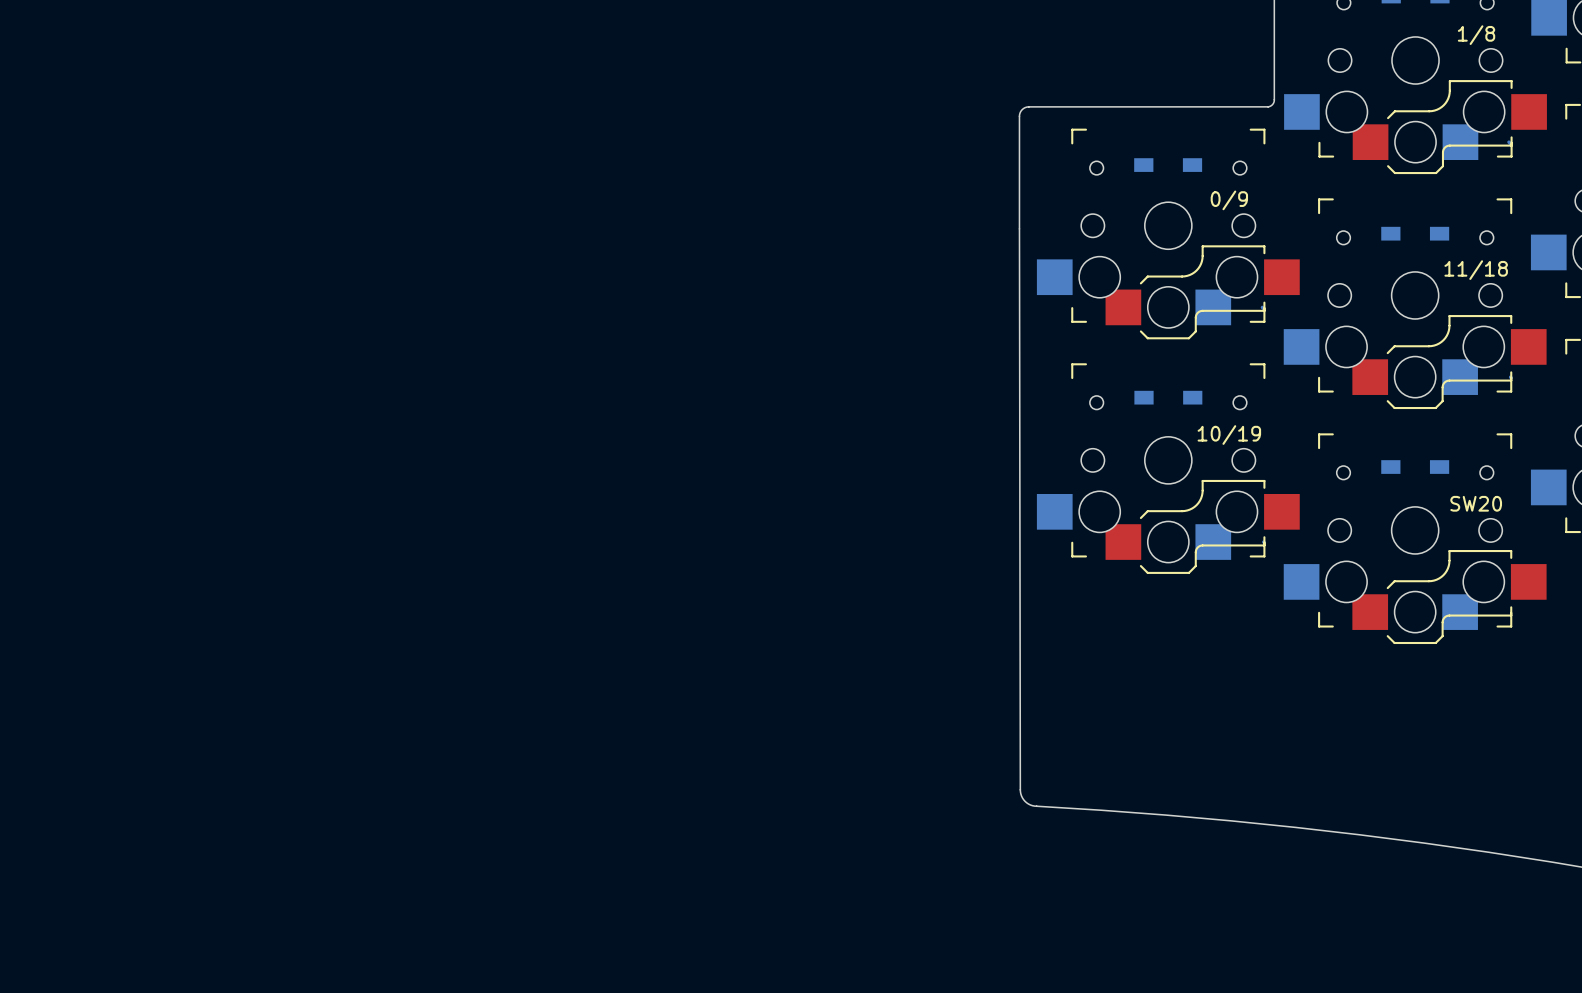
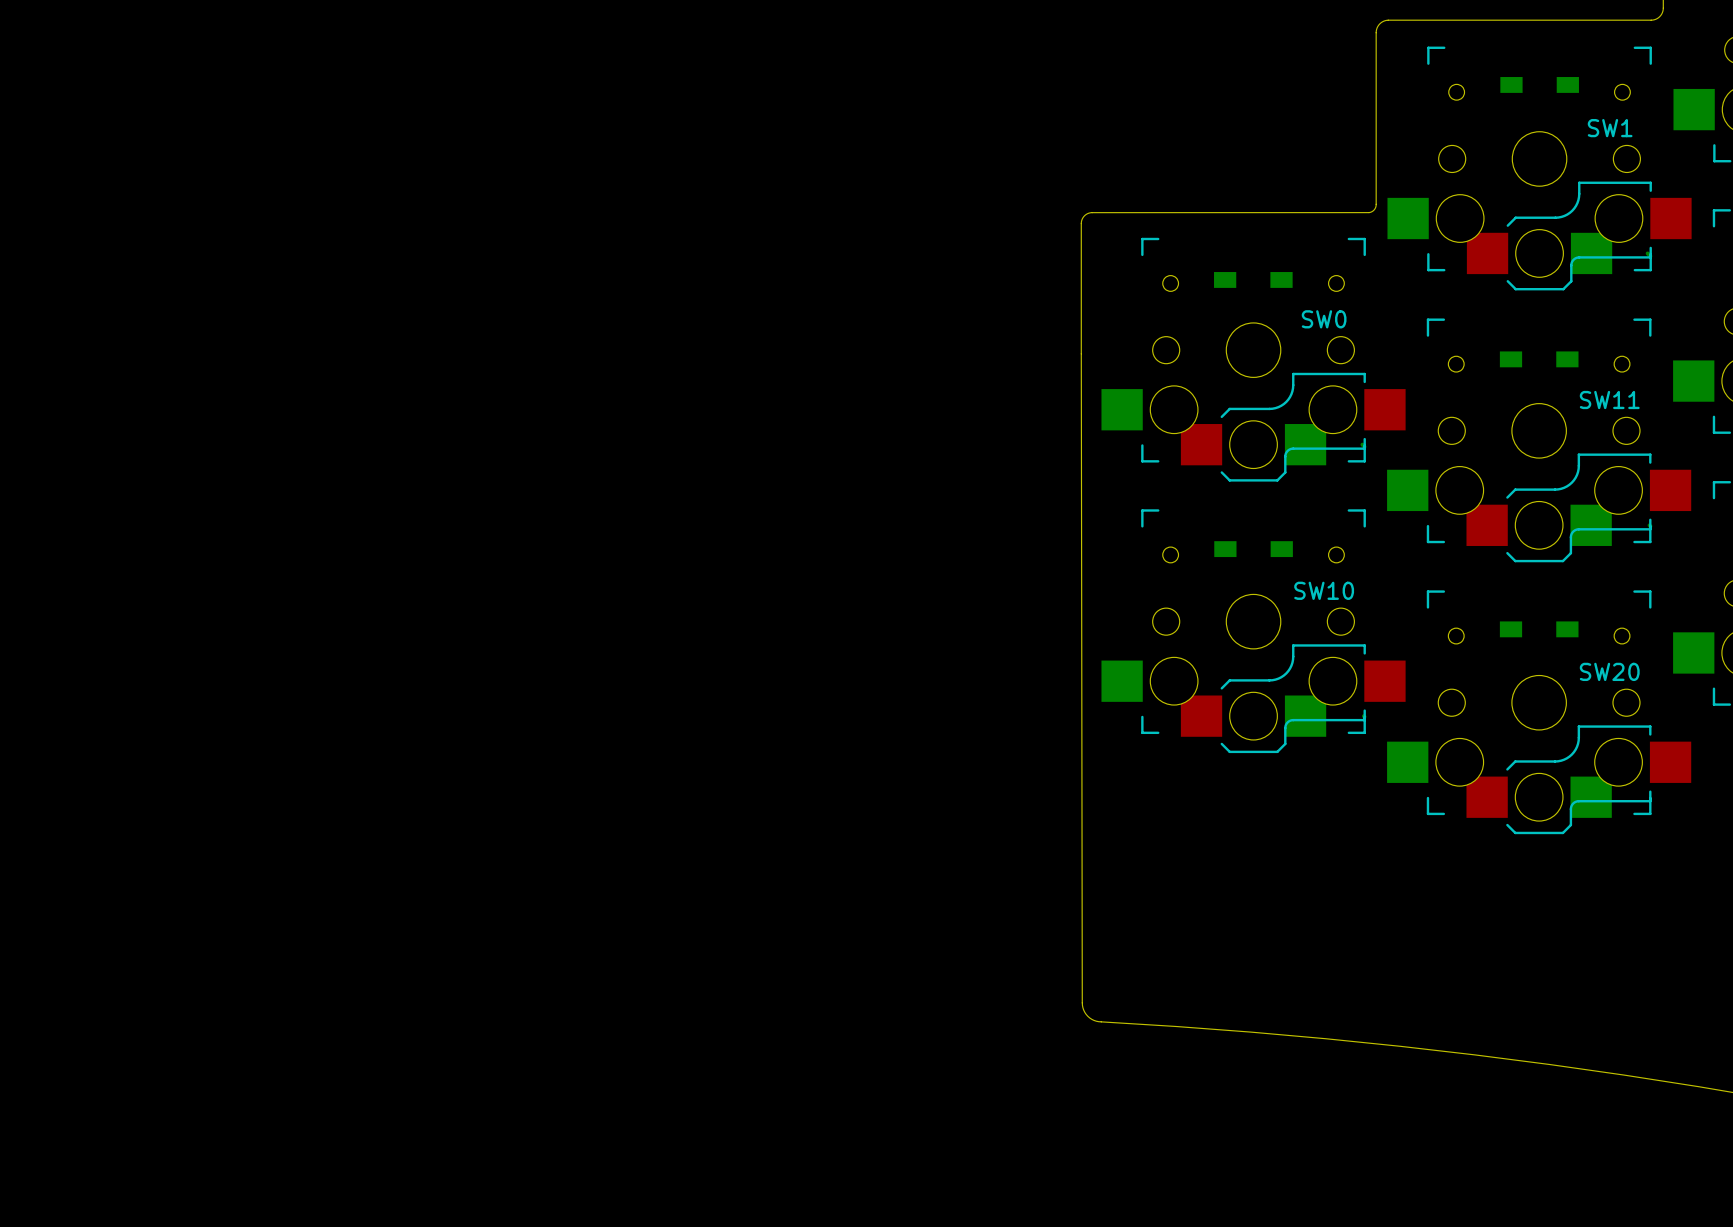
1/8 name: 1/8 (1476, 35) -> SW1 (1610, 128)
0/9 name: 0/9 (1229, 200) -> SW0 (1324, 319)
11/18 name: 11/18 (1476, 270) -> SW11 (1609, 400)
10/19 name: 10/19 (1229, 435) -> SW10 (1324, 590)

